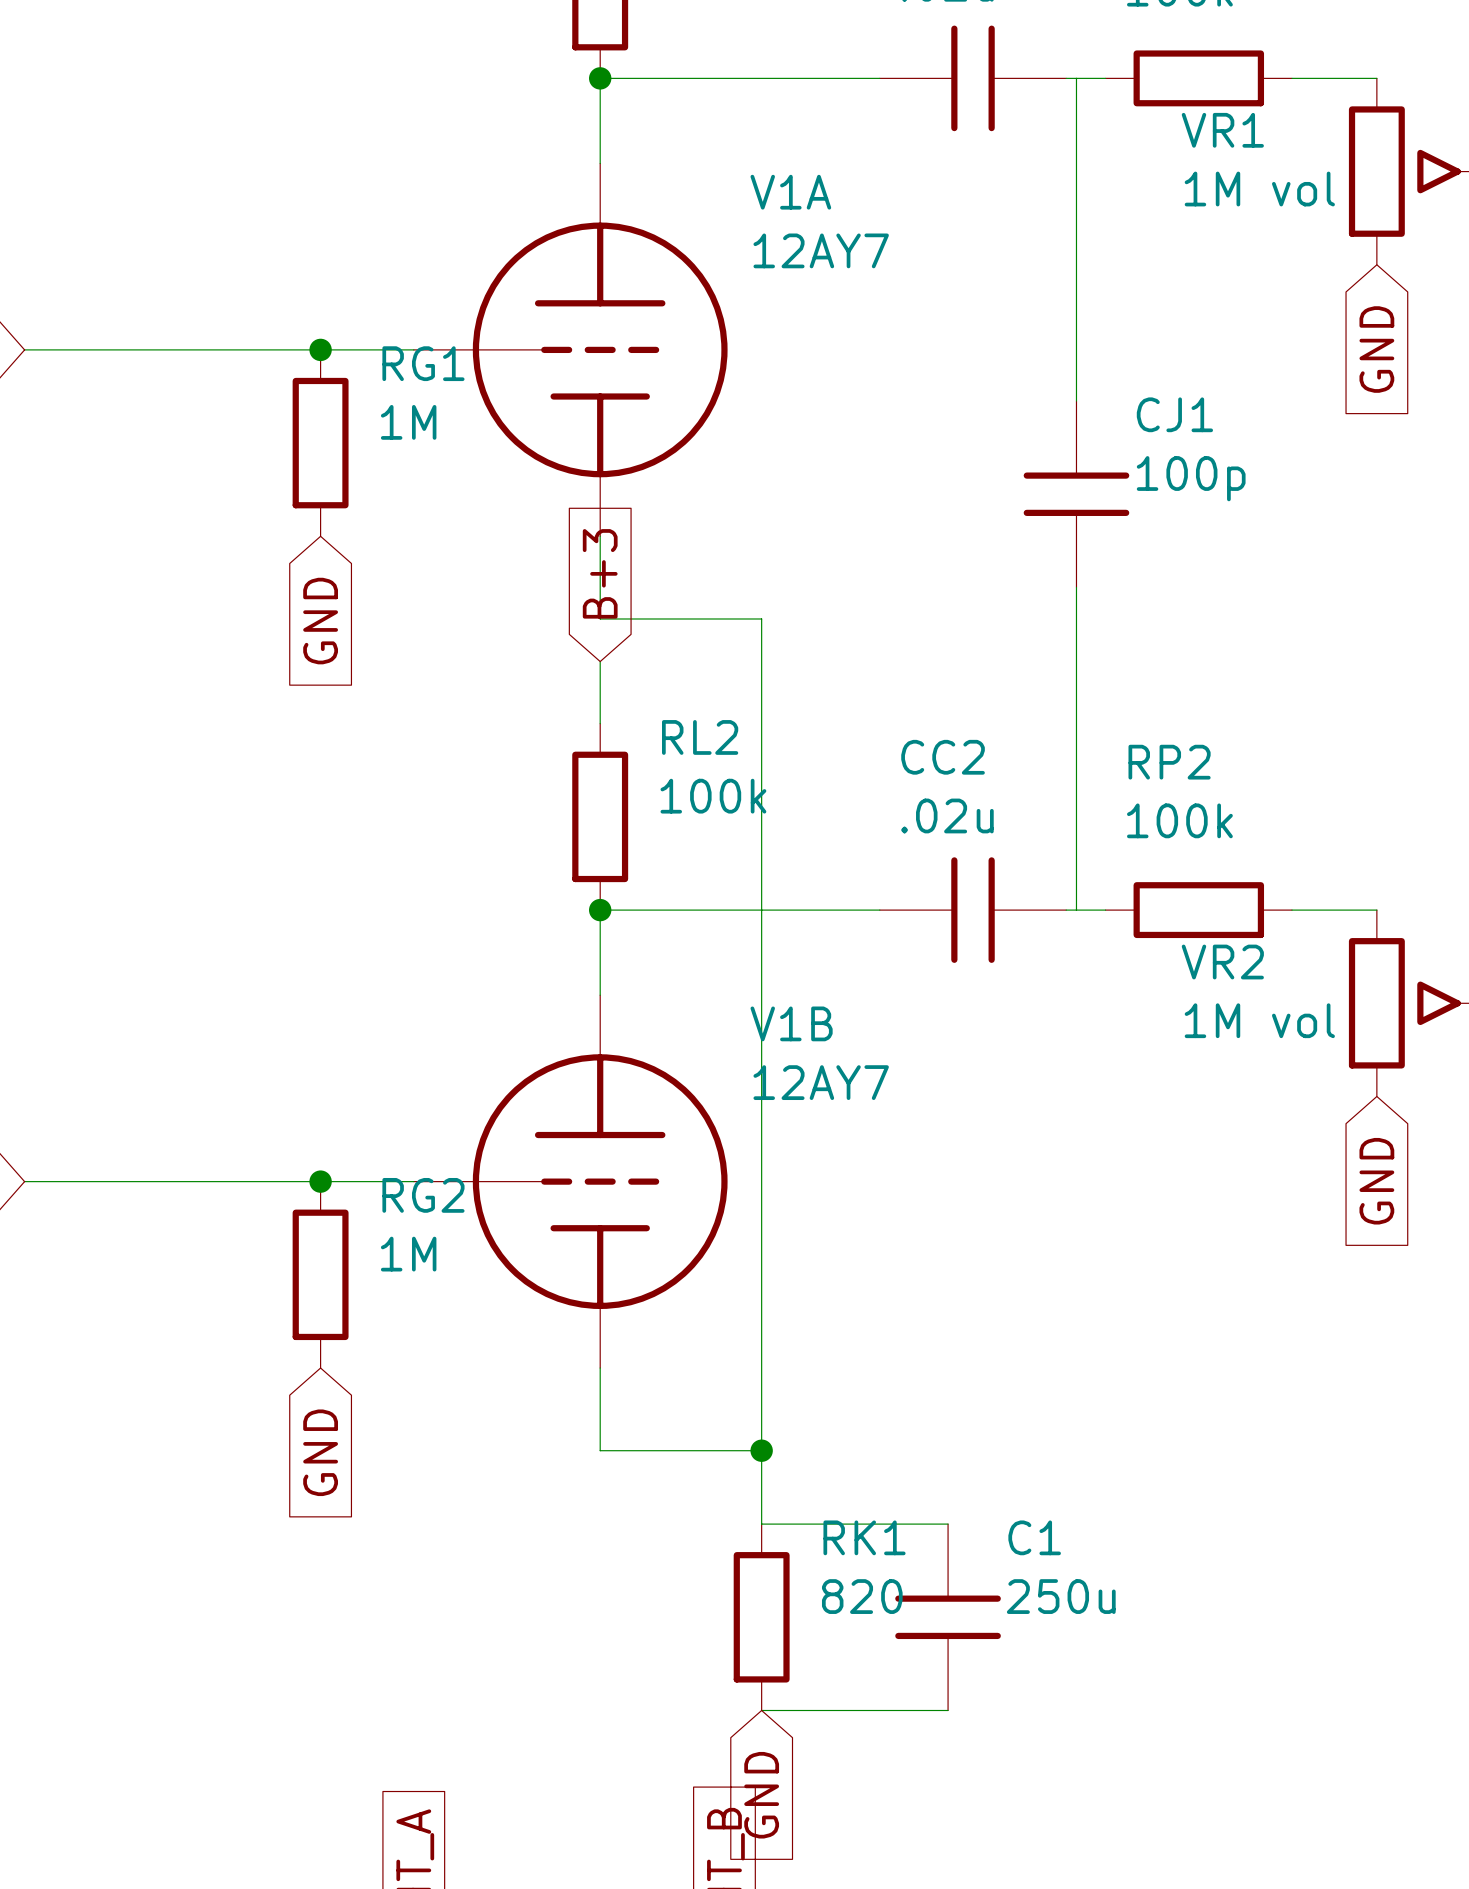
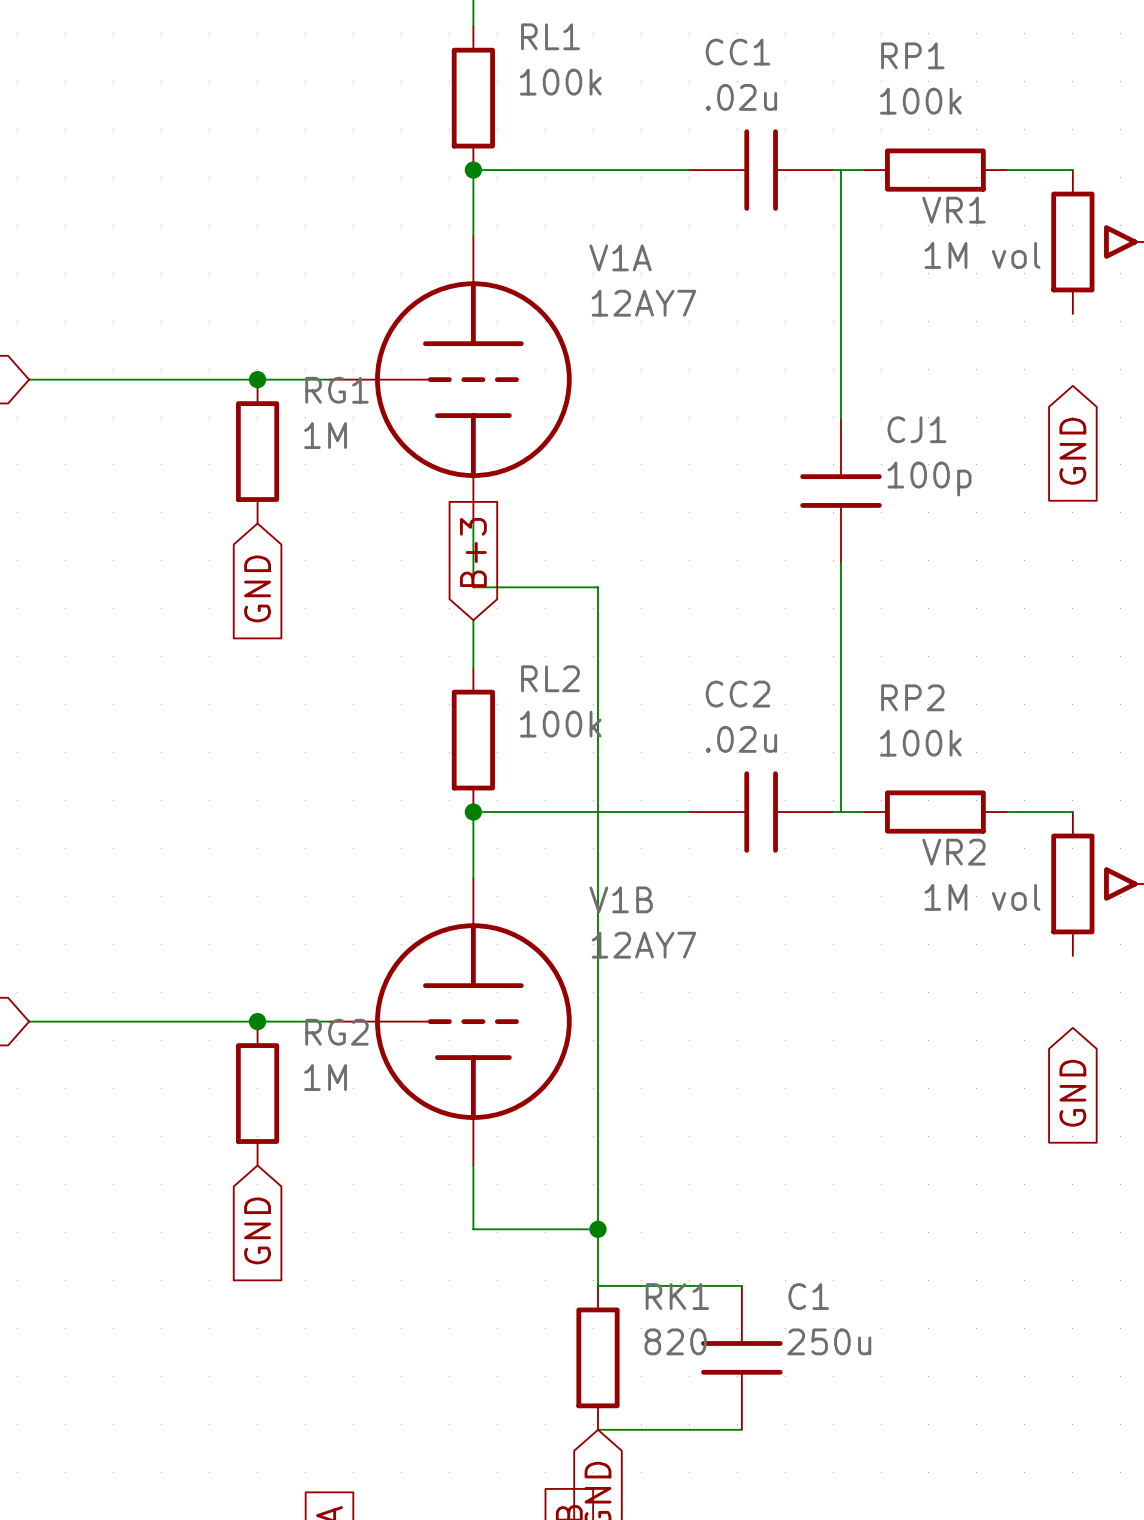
global label position: GND (1376, 349) -> GND (1072, 451)
global label position: GND (1376, 1181) -> GND (1072, 1093)

